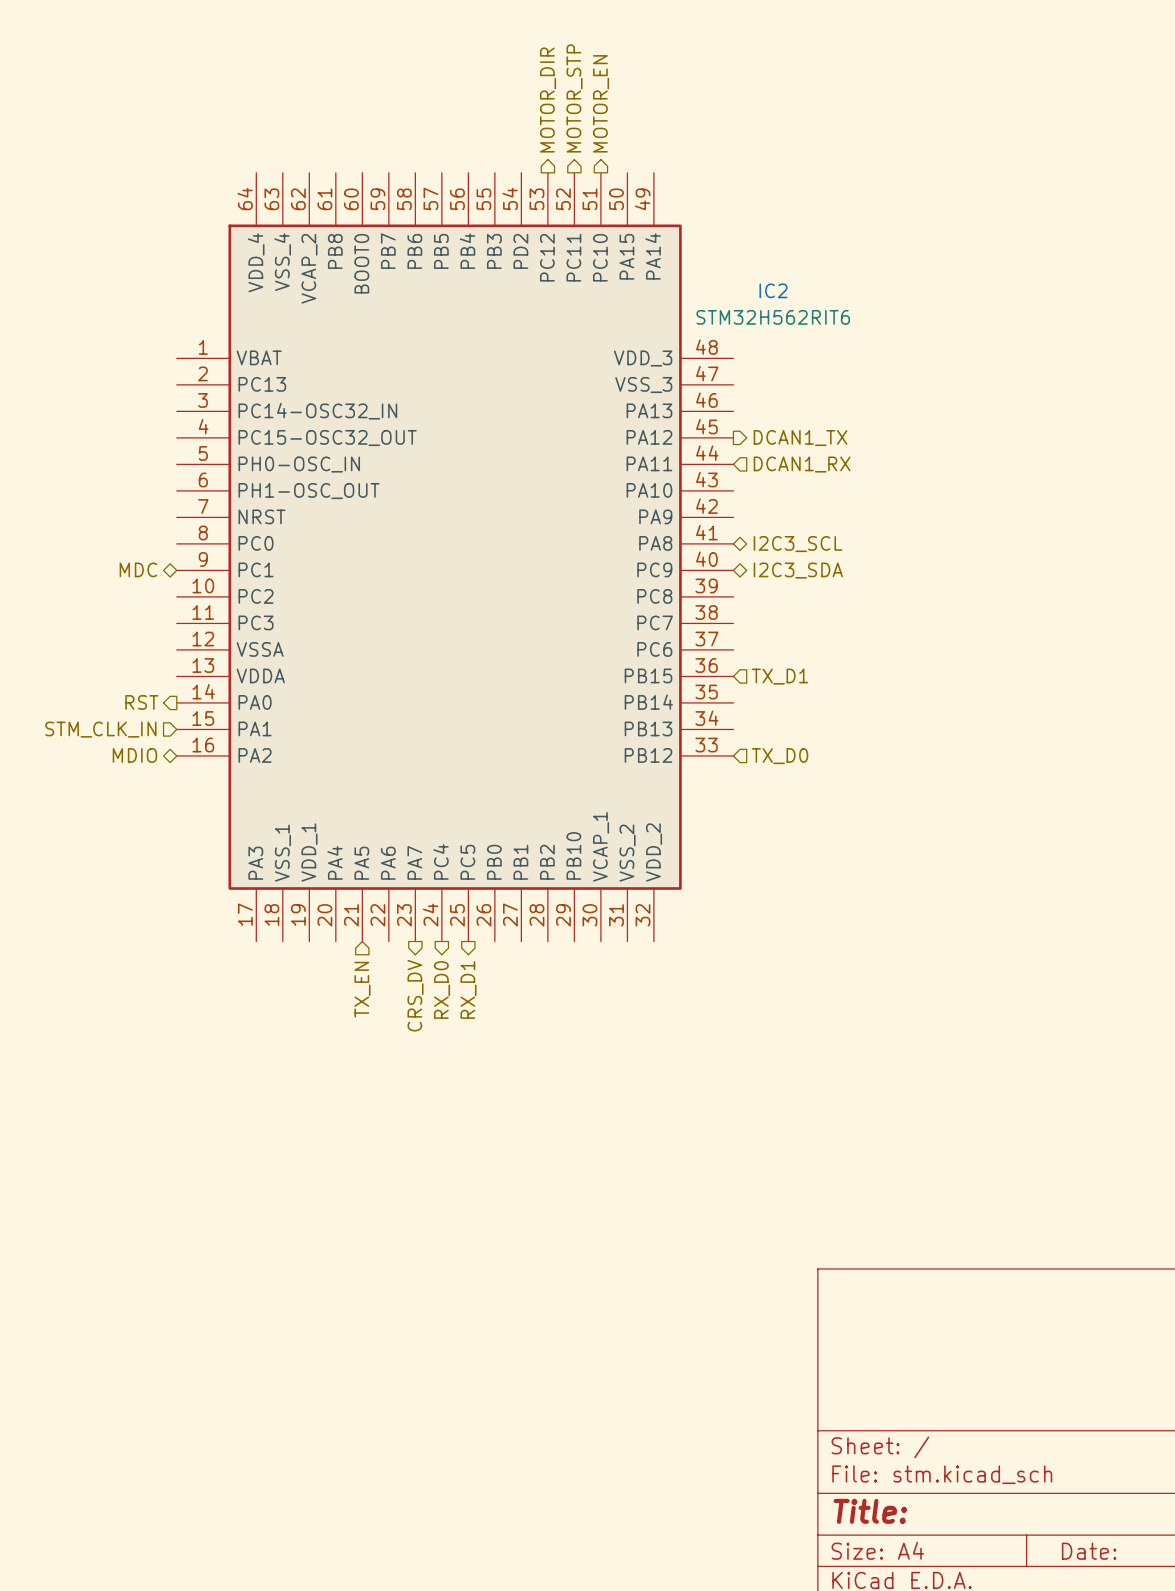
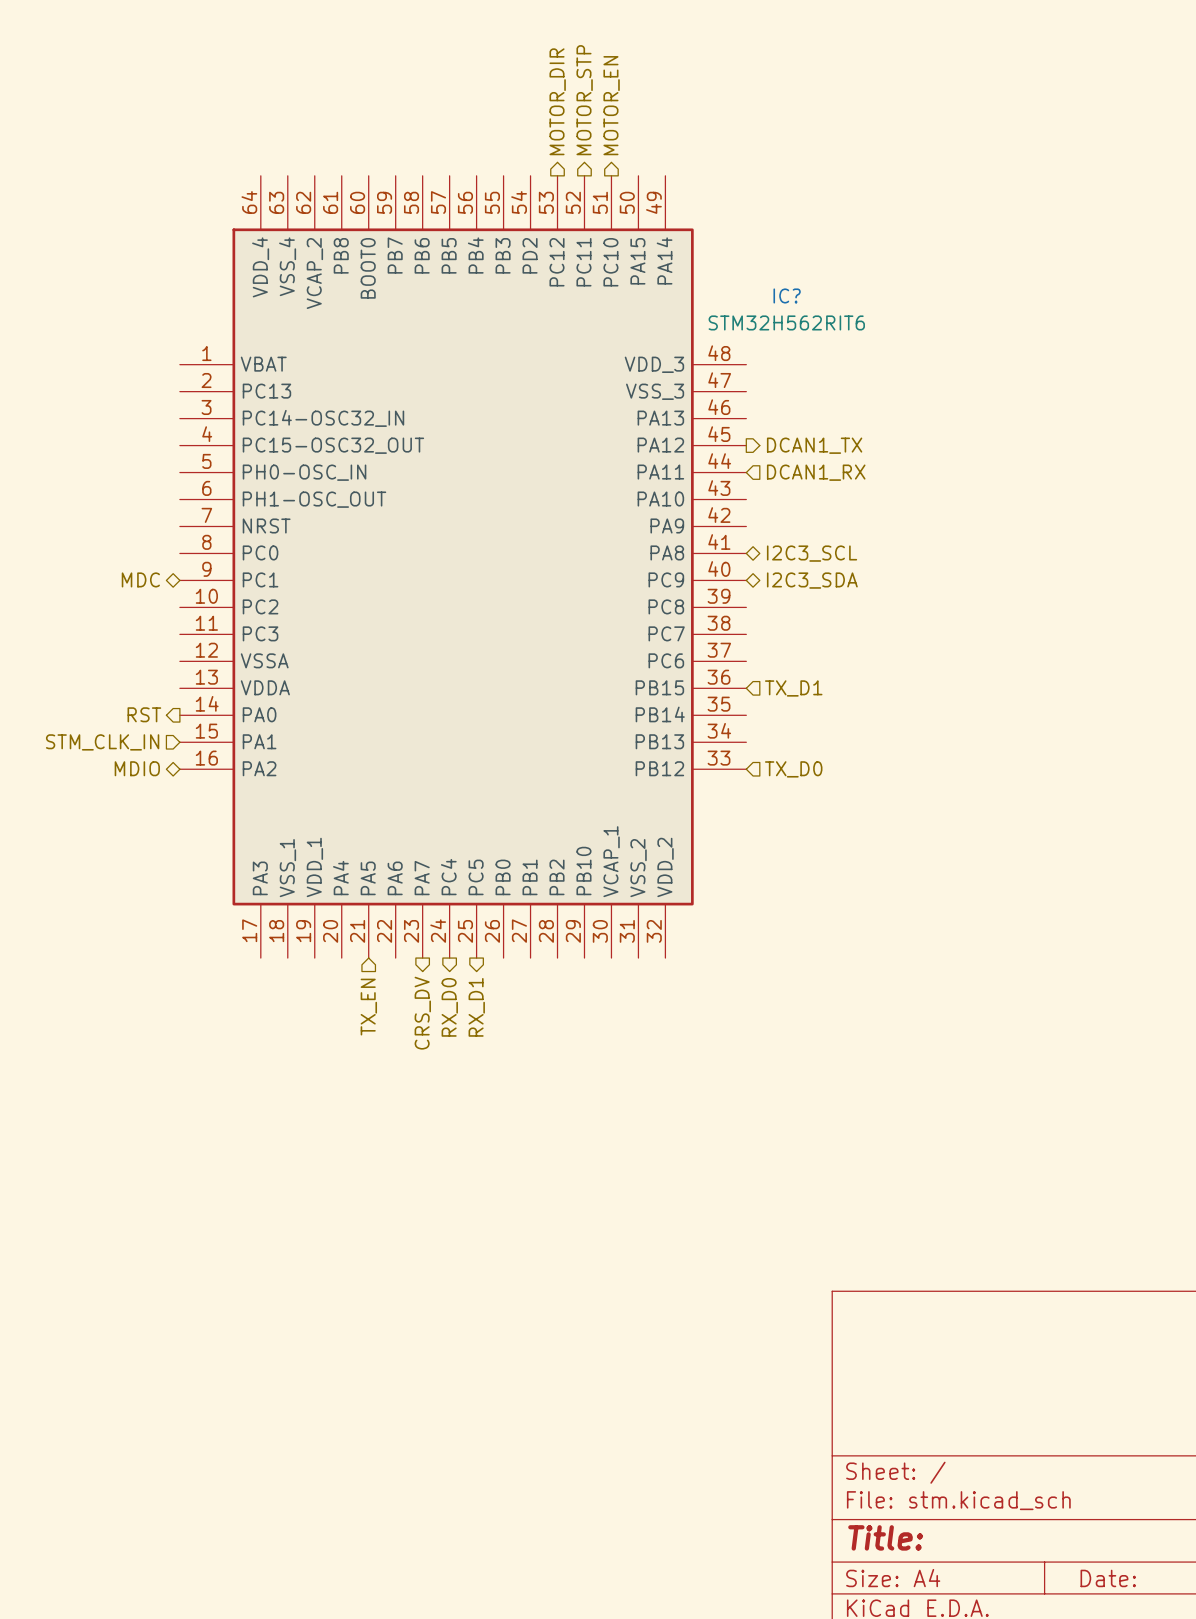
IC2 name: IC2 (773, 290) -> IC? (787, 295)

